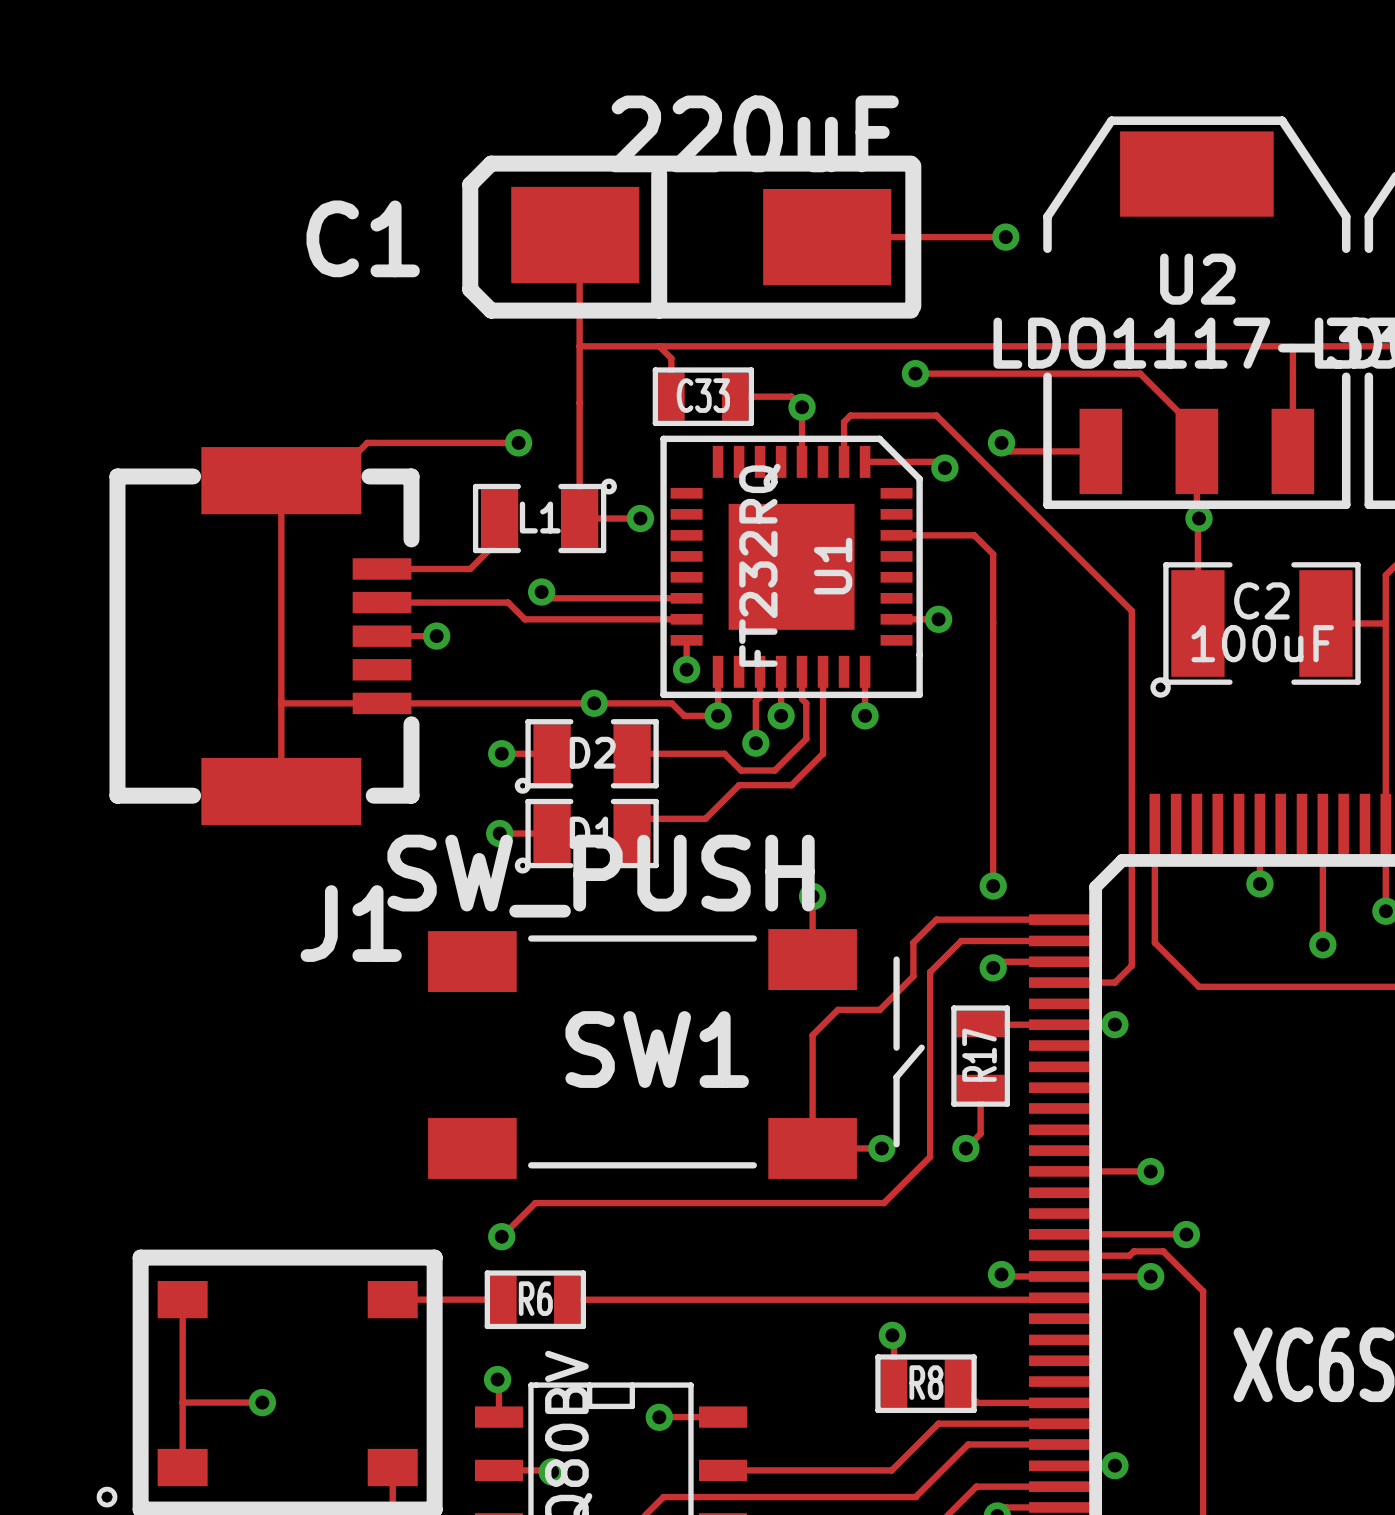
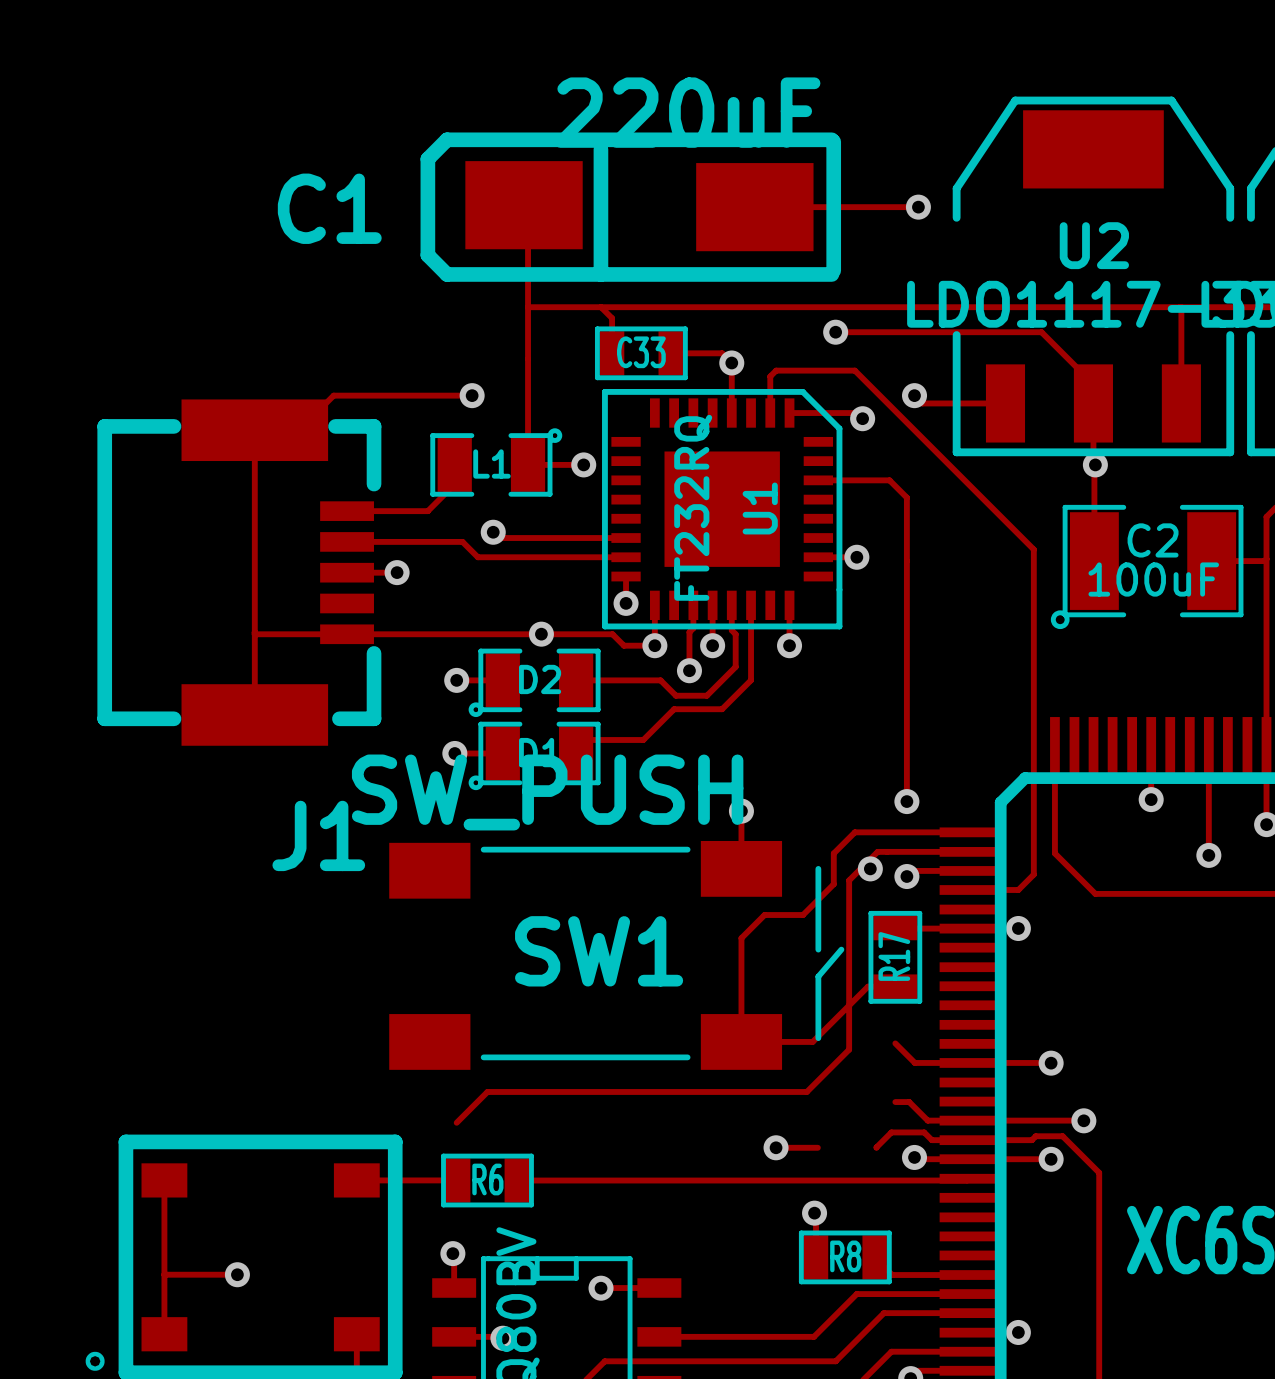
via: none -> (870, 868)
track: (980, 1088) (980, 1133) (965, 1148) -> (895, 986) (868, 986) (812, 1041) (804, 1041)
via: (881, 1148) -> none
via: (965, 1148) -> none
track: none -> (895, 1043) (914, 1062) (968, 1062)
track: none -> (895, 1102) (909, 1102) (927, 1120) (968, 1120)
via: (501, 1236) -> none
track: none -> (968, 1140) (931, 1140) (924, 1132) (891, 1132) (876, 1147)
track: none -> (776, 1147) (817, 1147)
via: none -> (776, 1147)

